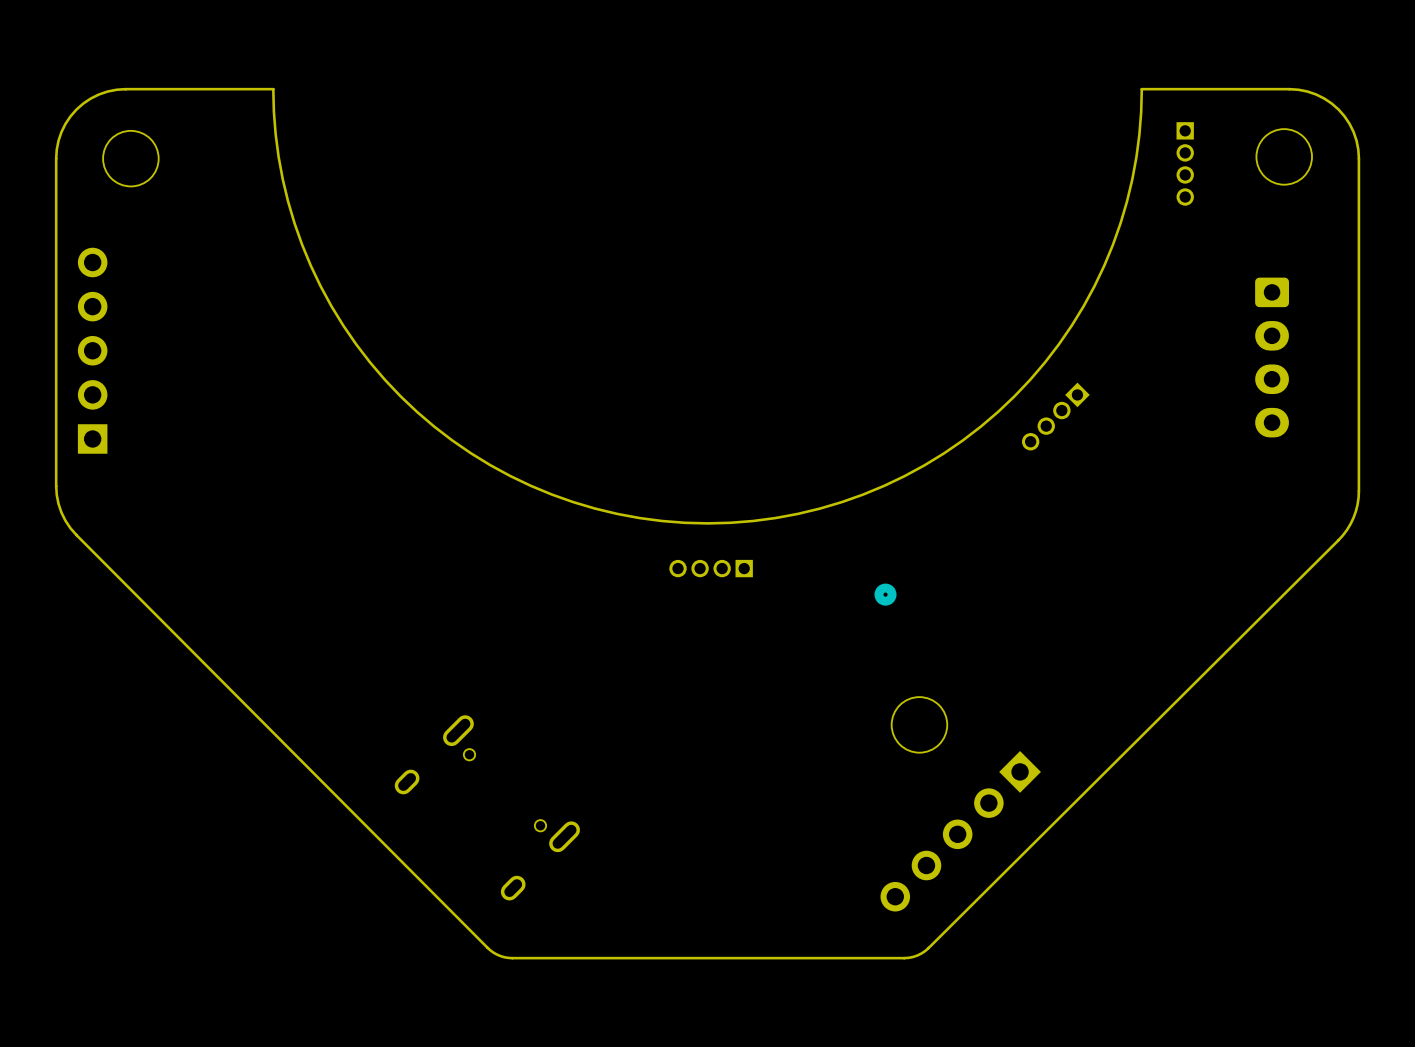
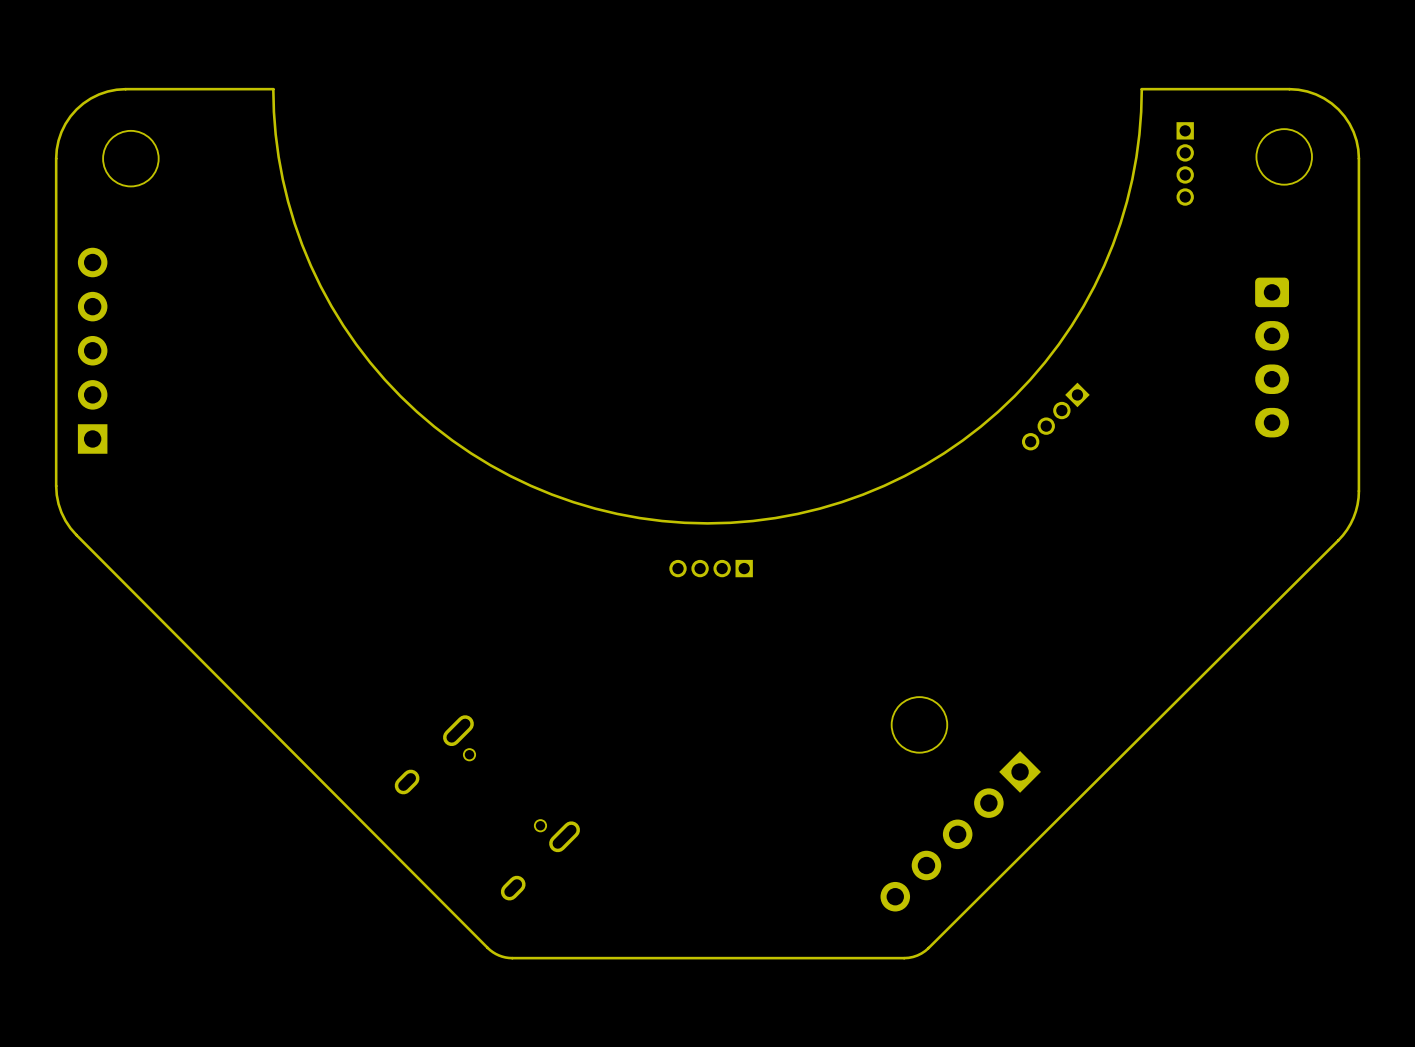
part: (885, 594) -> none

